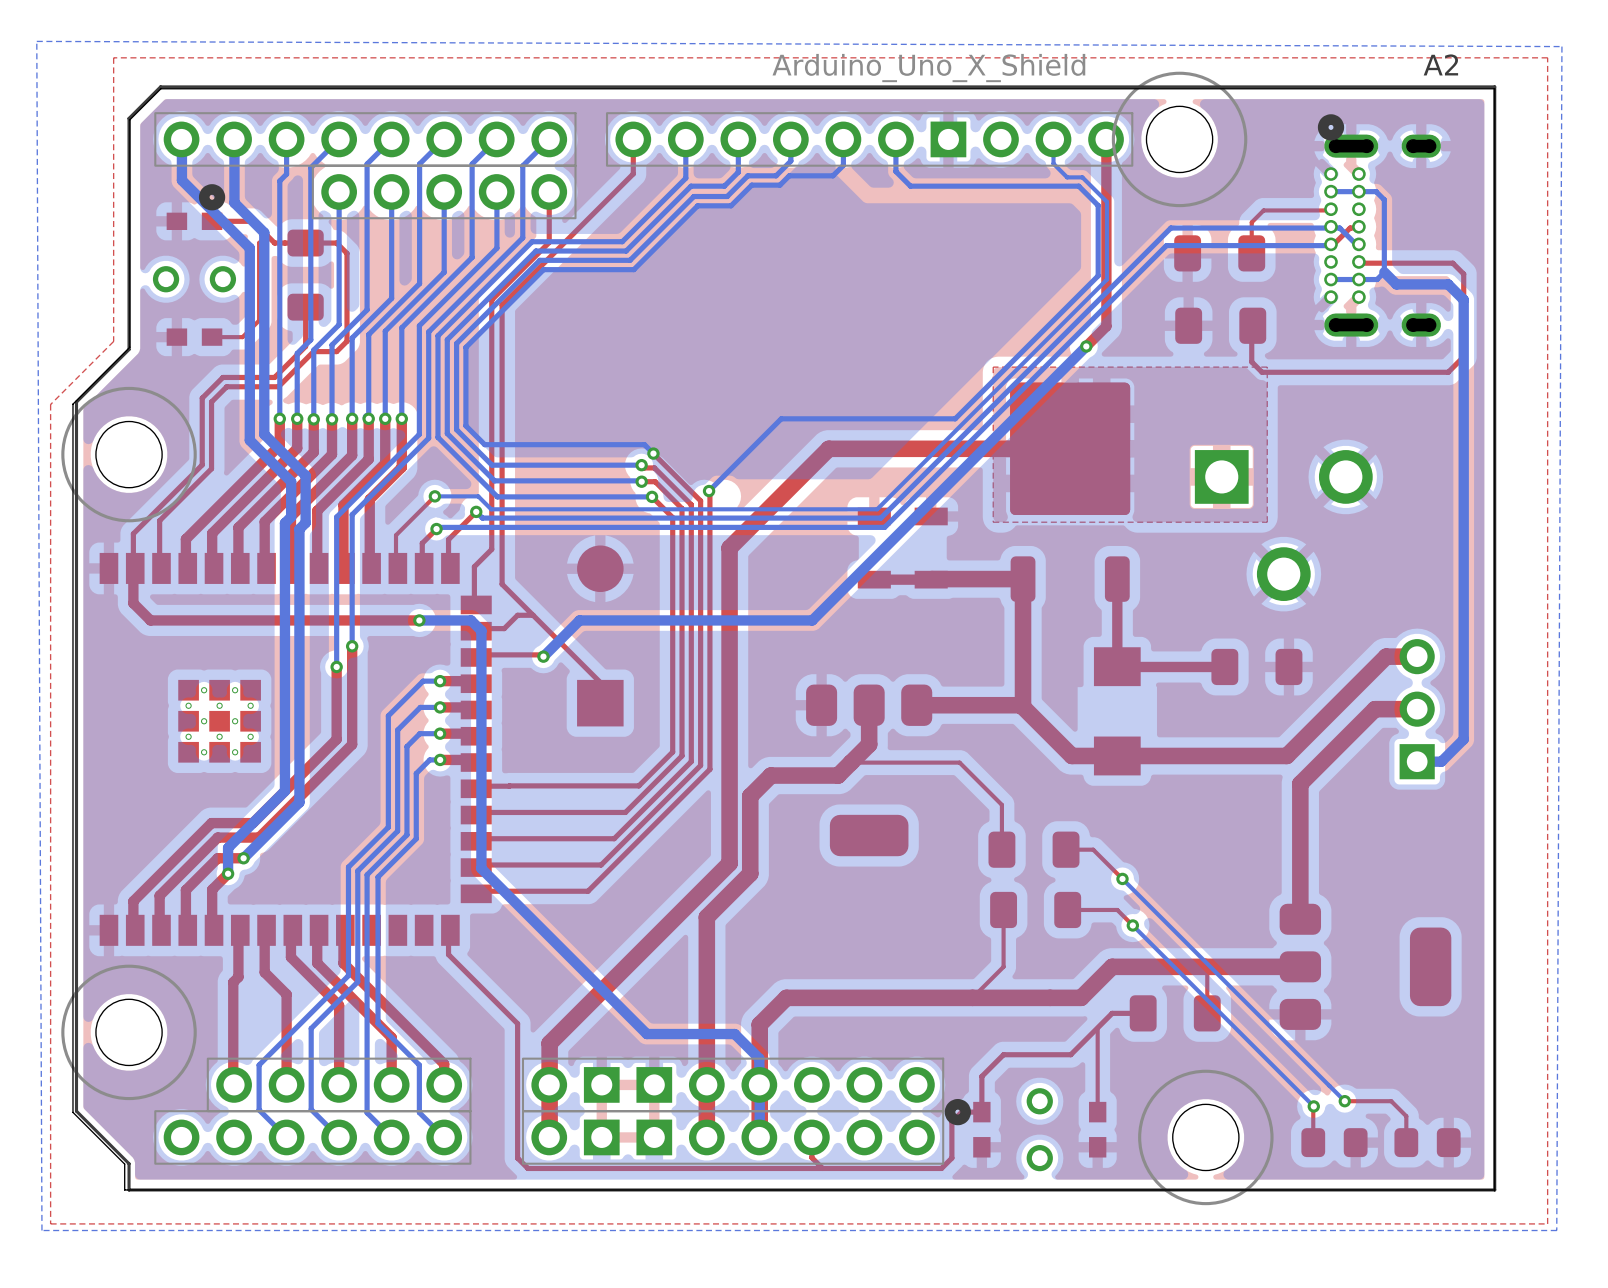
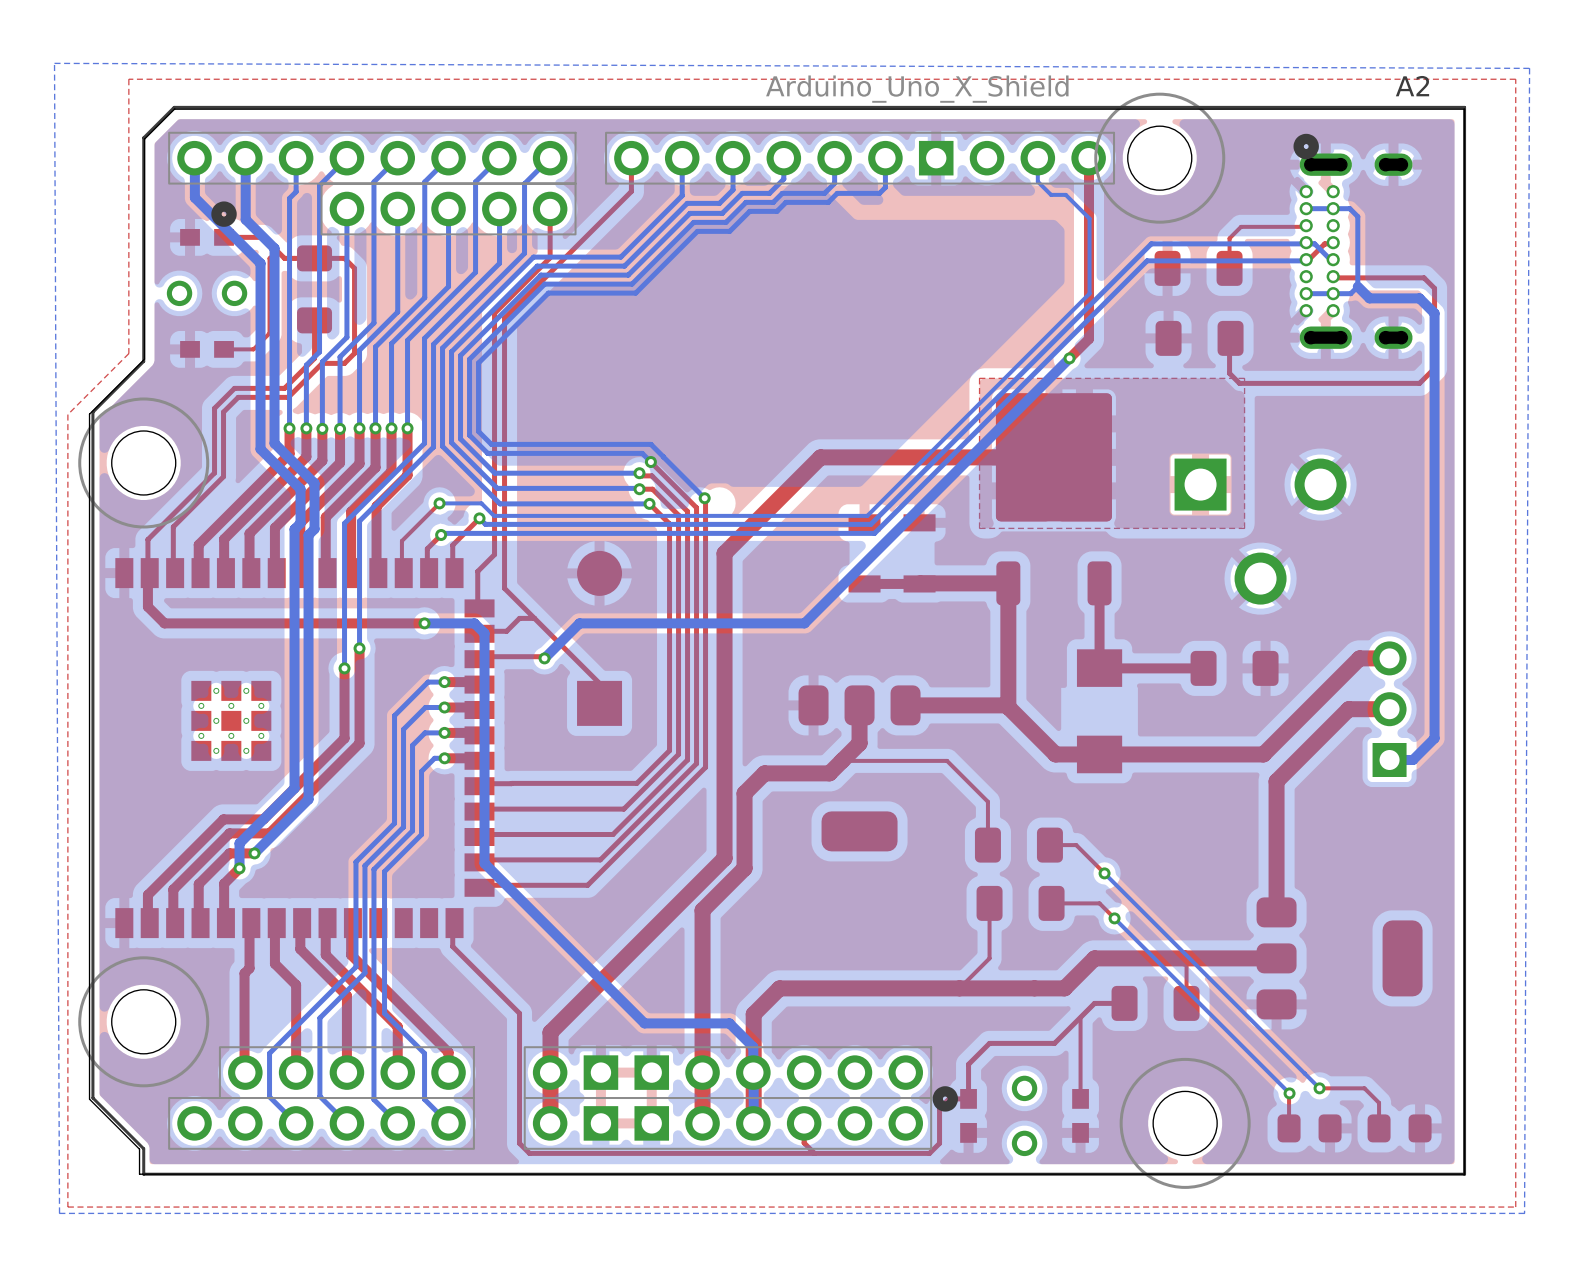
bottom track: (895, 169) (910, 186) (1078, 186) (1098, 205) (1098, 275) (955, 418) (781, 418) (709, 491) -> (885, 187) (879, 193) (837, 193) (828, 202) (786, 202) (777, 211) (749, 211) (729, 231) (697, 231) (635, 293) (548, 293) (478, 363) (478, 431) (491, 444) (650, 444) (663, 456)
bottom track: none -> (663, 456) (704, 498)

